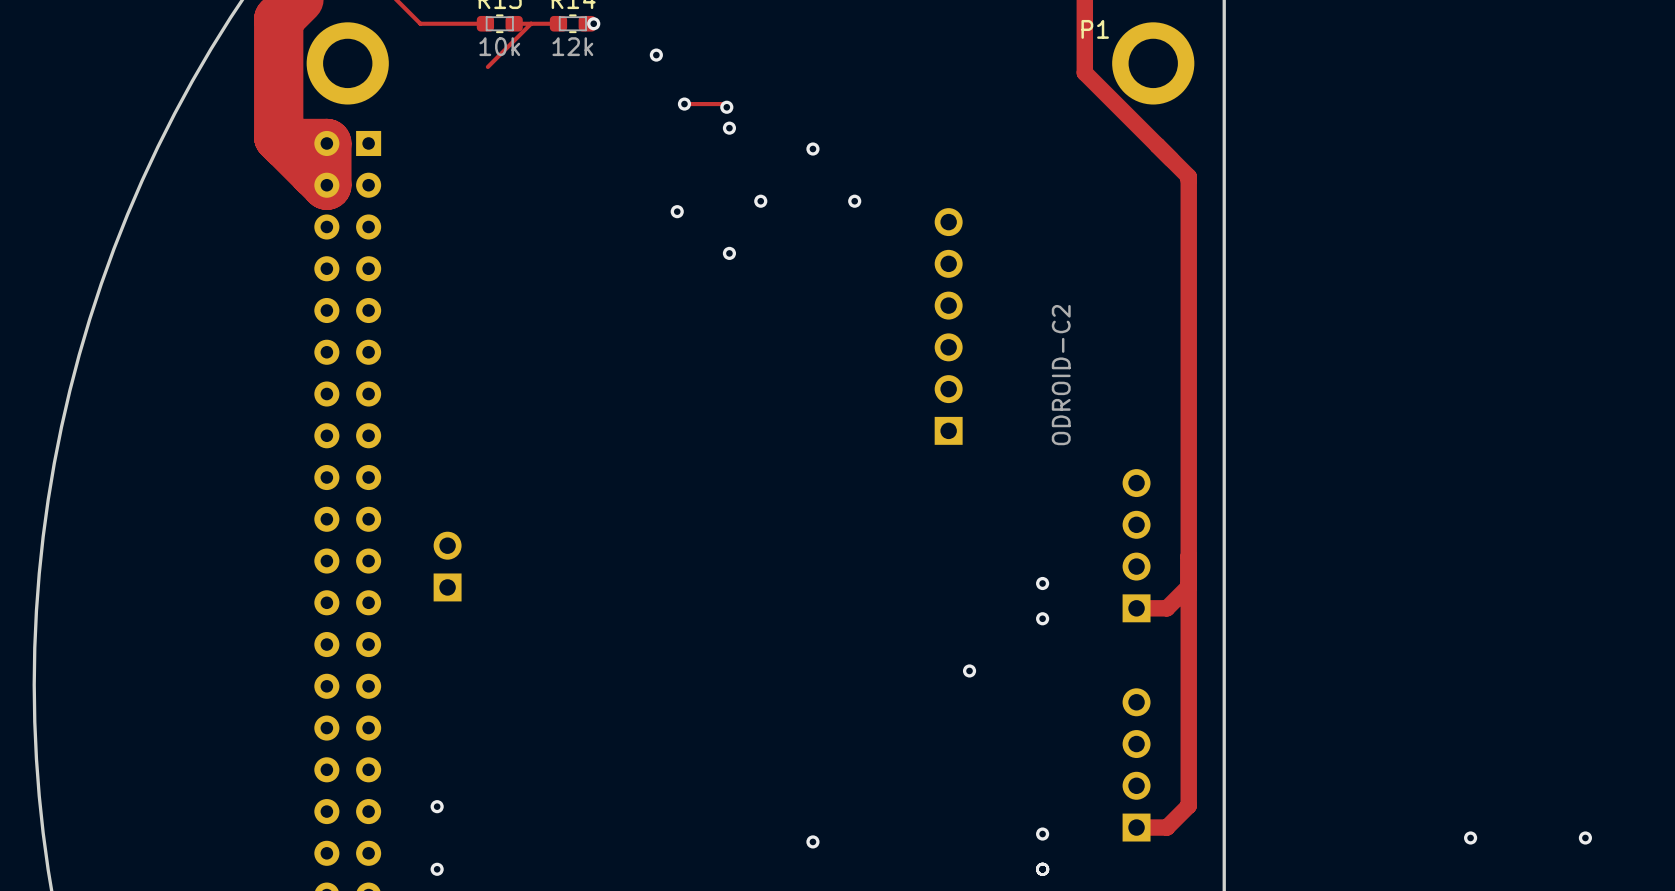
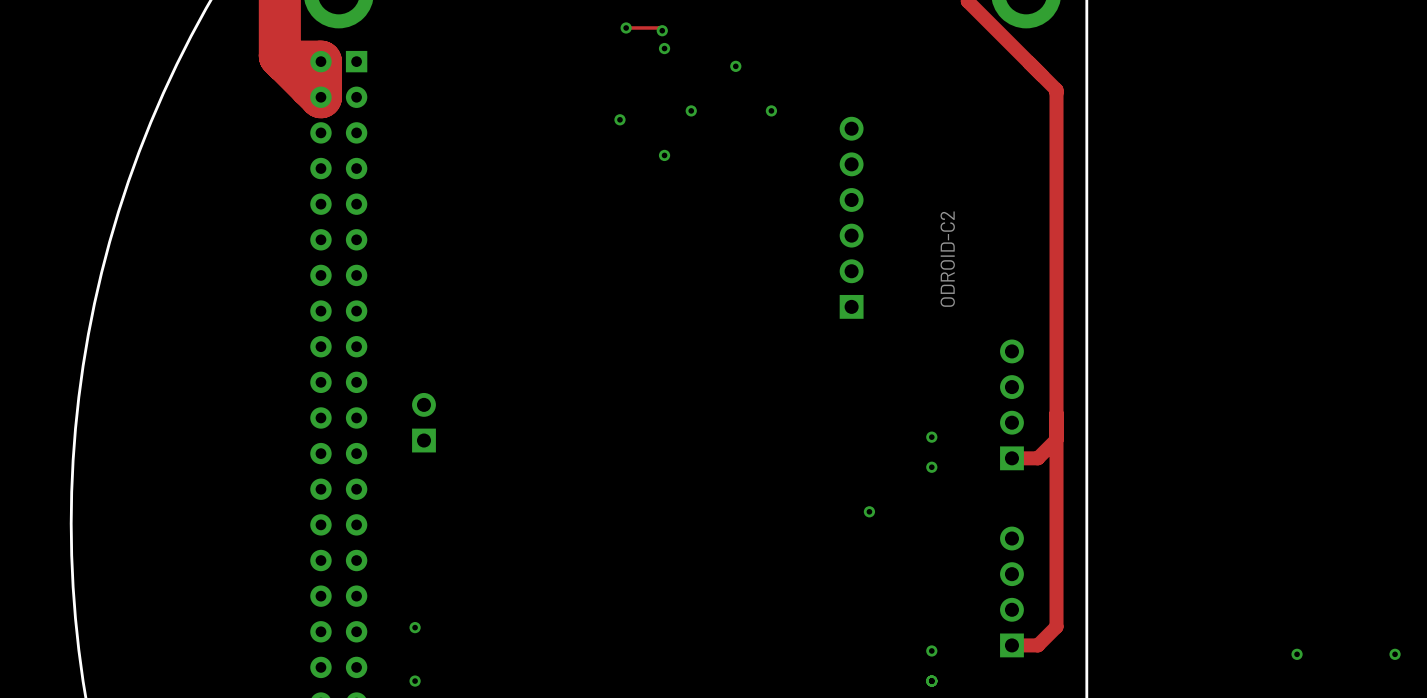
via: (812, 841) -> none

